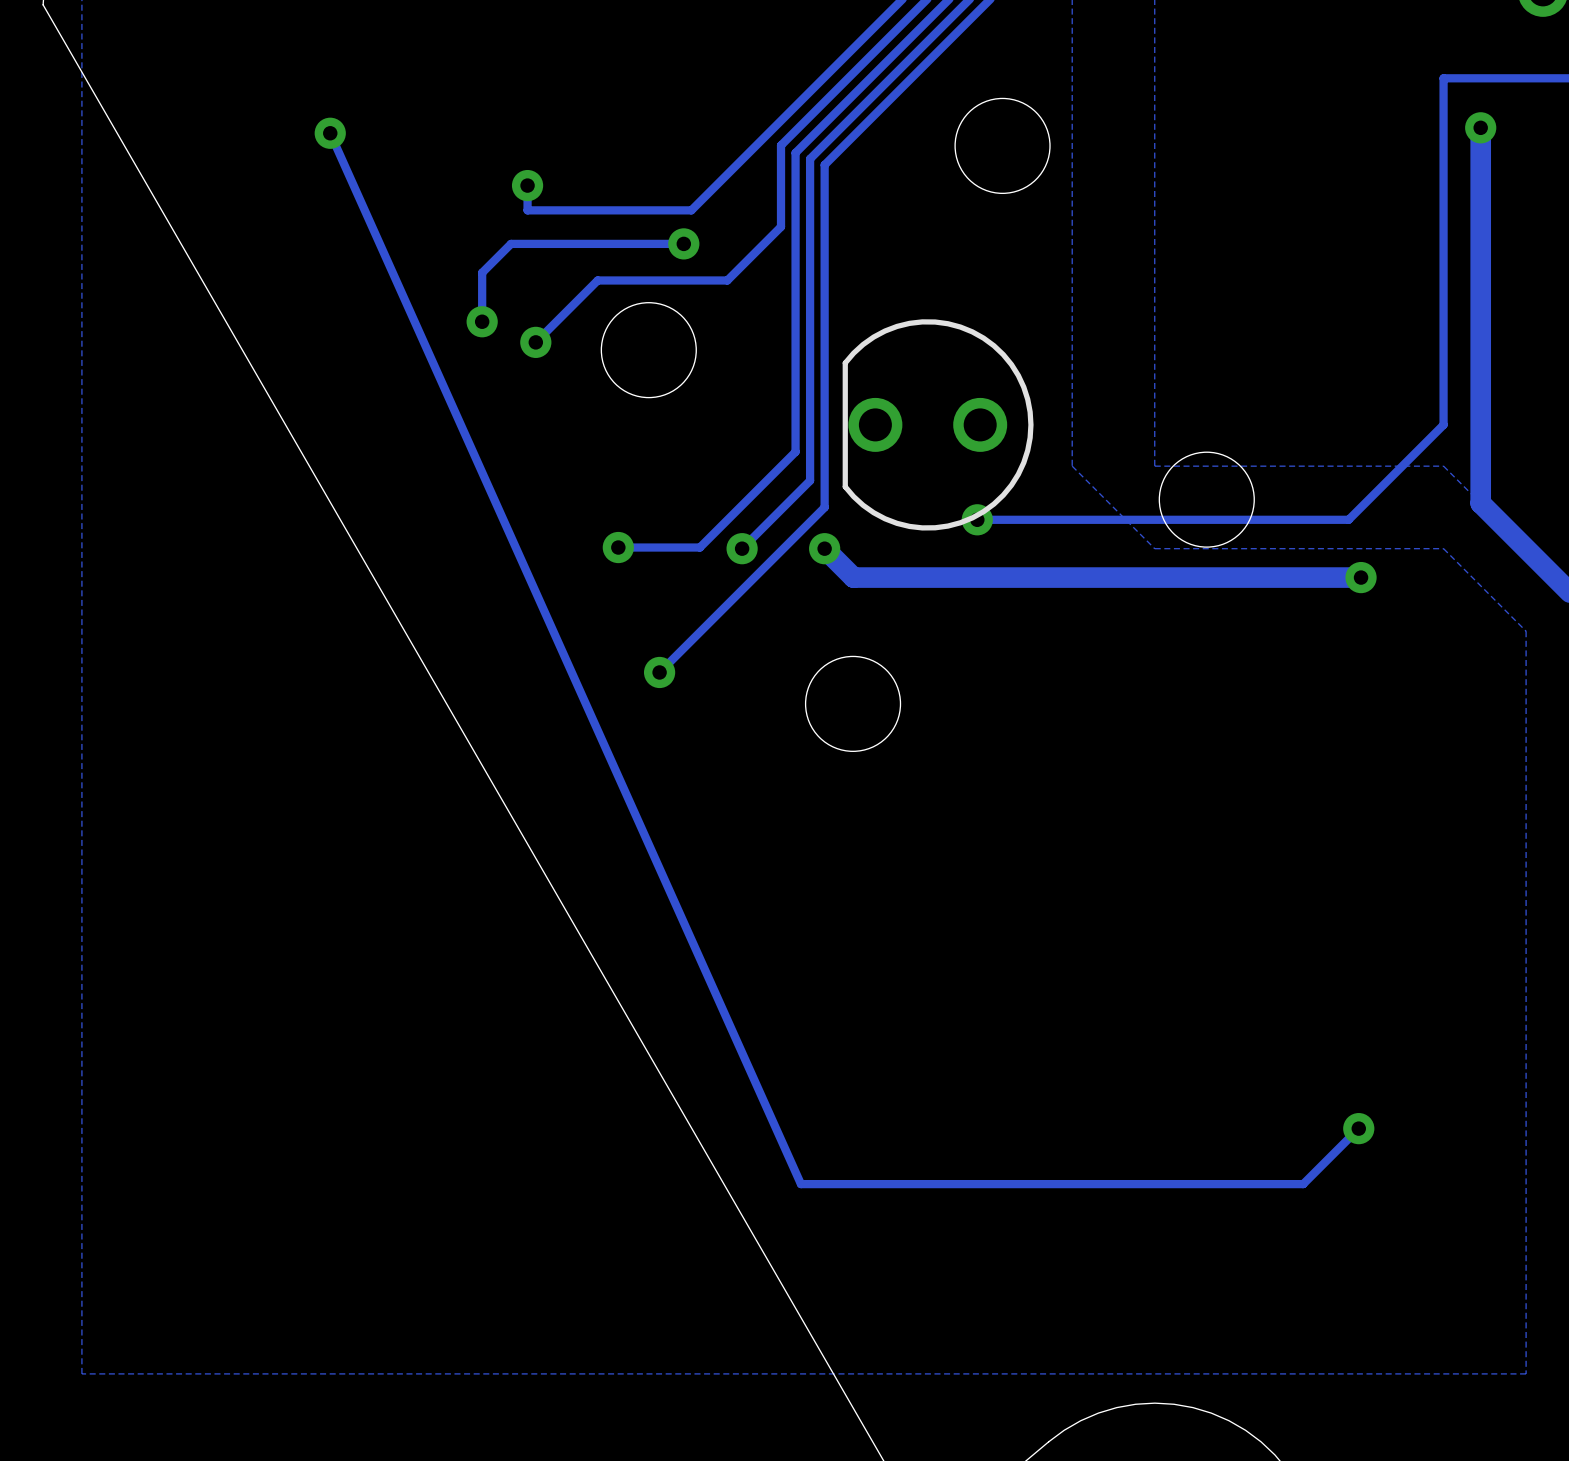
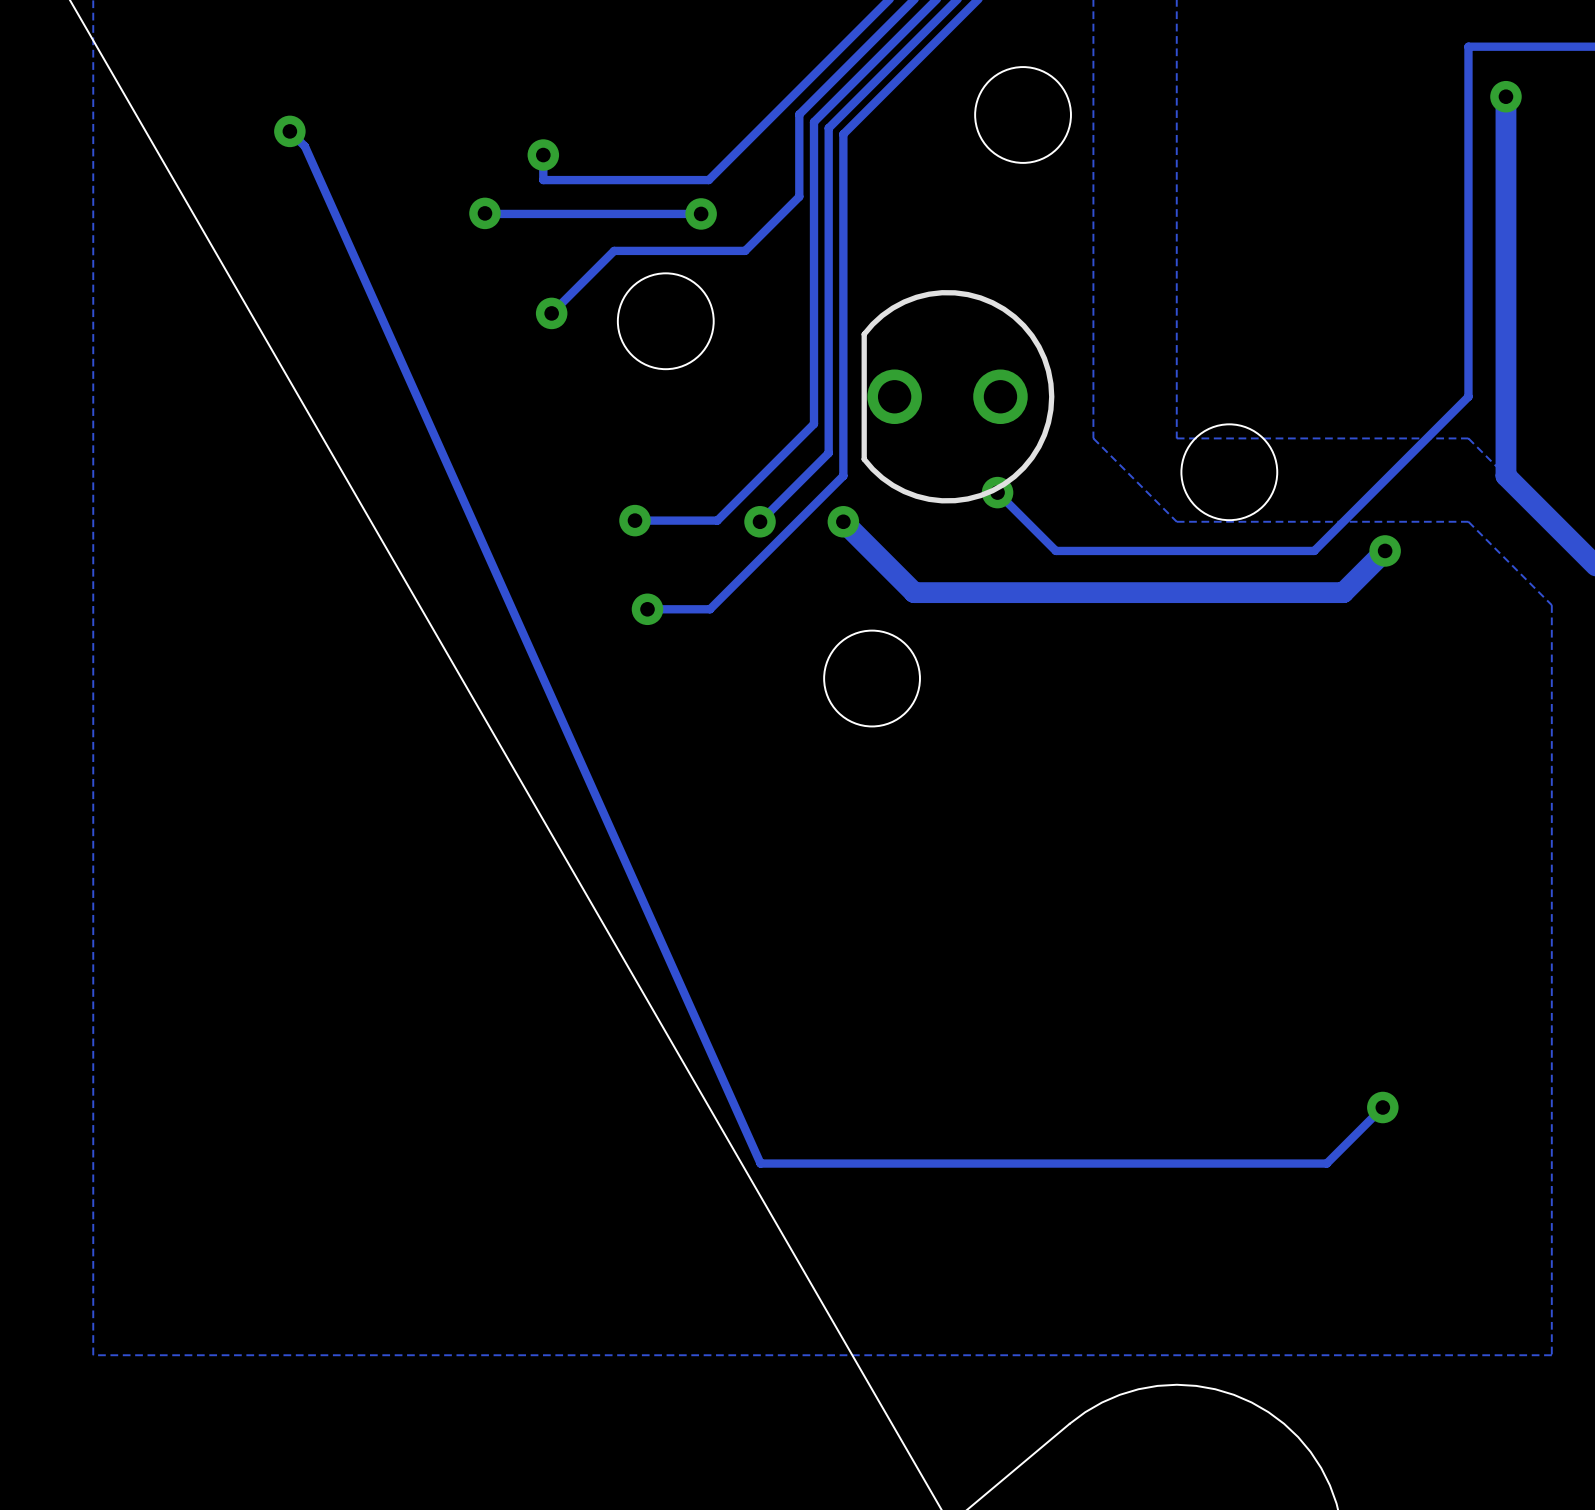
track: (330, 133) (800, 1184) -> (289, 131) (304, 146) (760, 1163) (819, 1163)
via position: (330, 133) -> (289, 131)
track: (511, 243) (482, 272) (482, 321) -> (526, 213) (485, 213)
via position: (482, 321) -> (484, 213)
track: (824, 503) (824, 507) (659, 672) -> (843, 475) (710, 609) (647, 609)
track: (1348, 519) (977, 519) -> none
track: (1035, 577) (853, 577) -> (1055, 550) (997, 492)
track width: thick (1290, 577) (1035, 577) -> thin (1314, 550) (1055, 550)
track: (1361, 577) (1290, 577) -> (1372, 492) (1314, 550)
track: none -> (1385, 550) (1343, 592) (914, 592) (872, 550)
via position: (659, 672) -> (647, 609)

